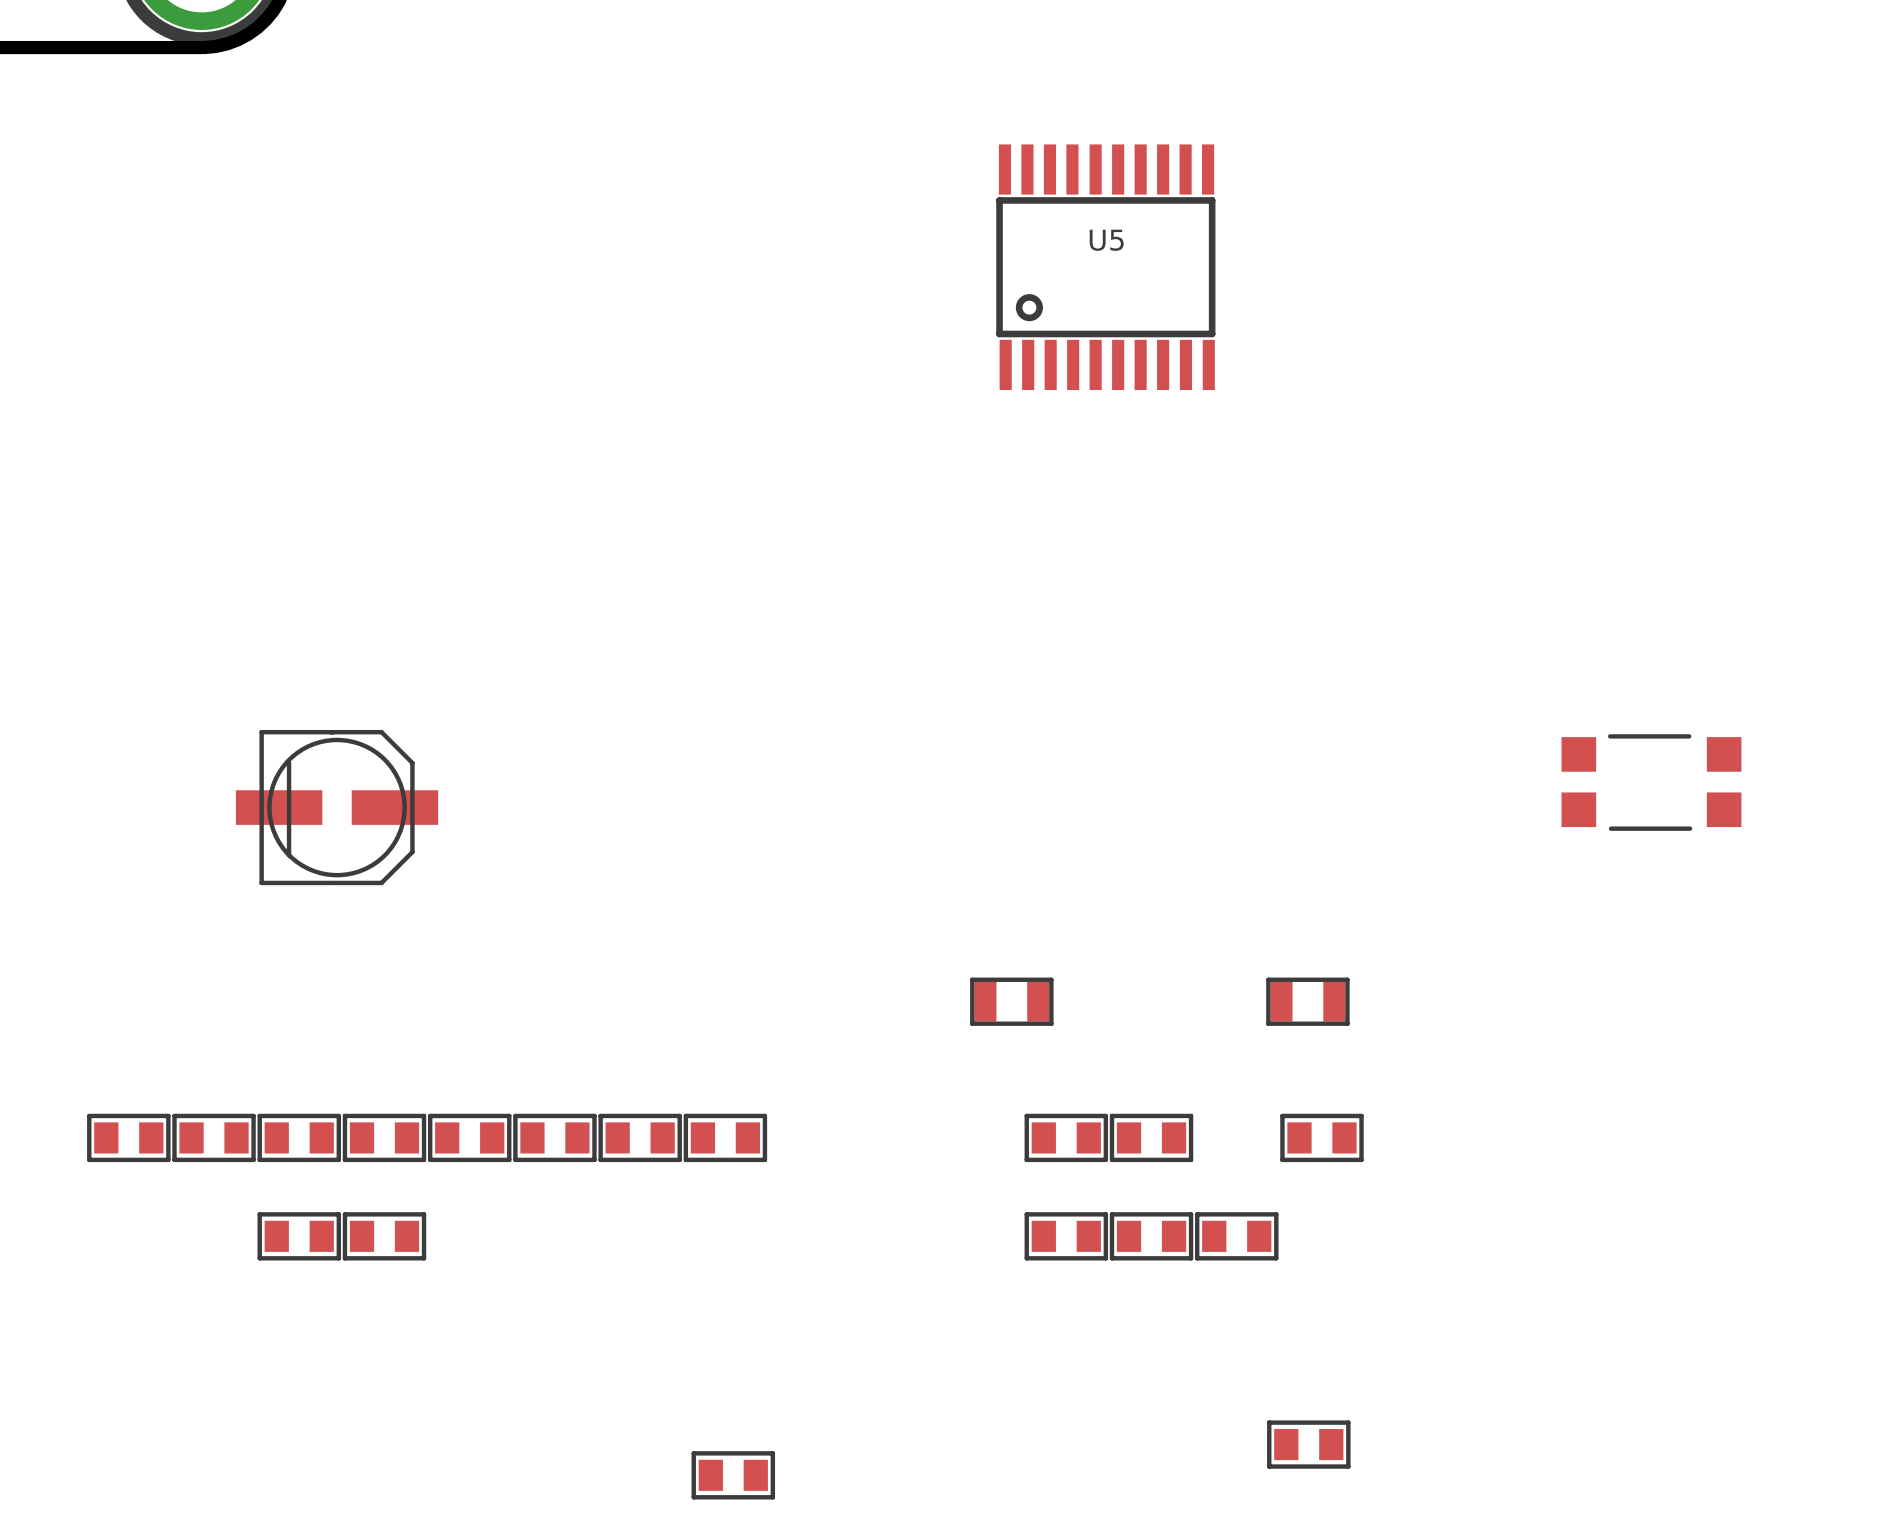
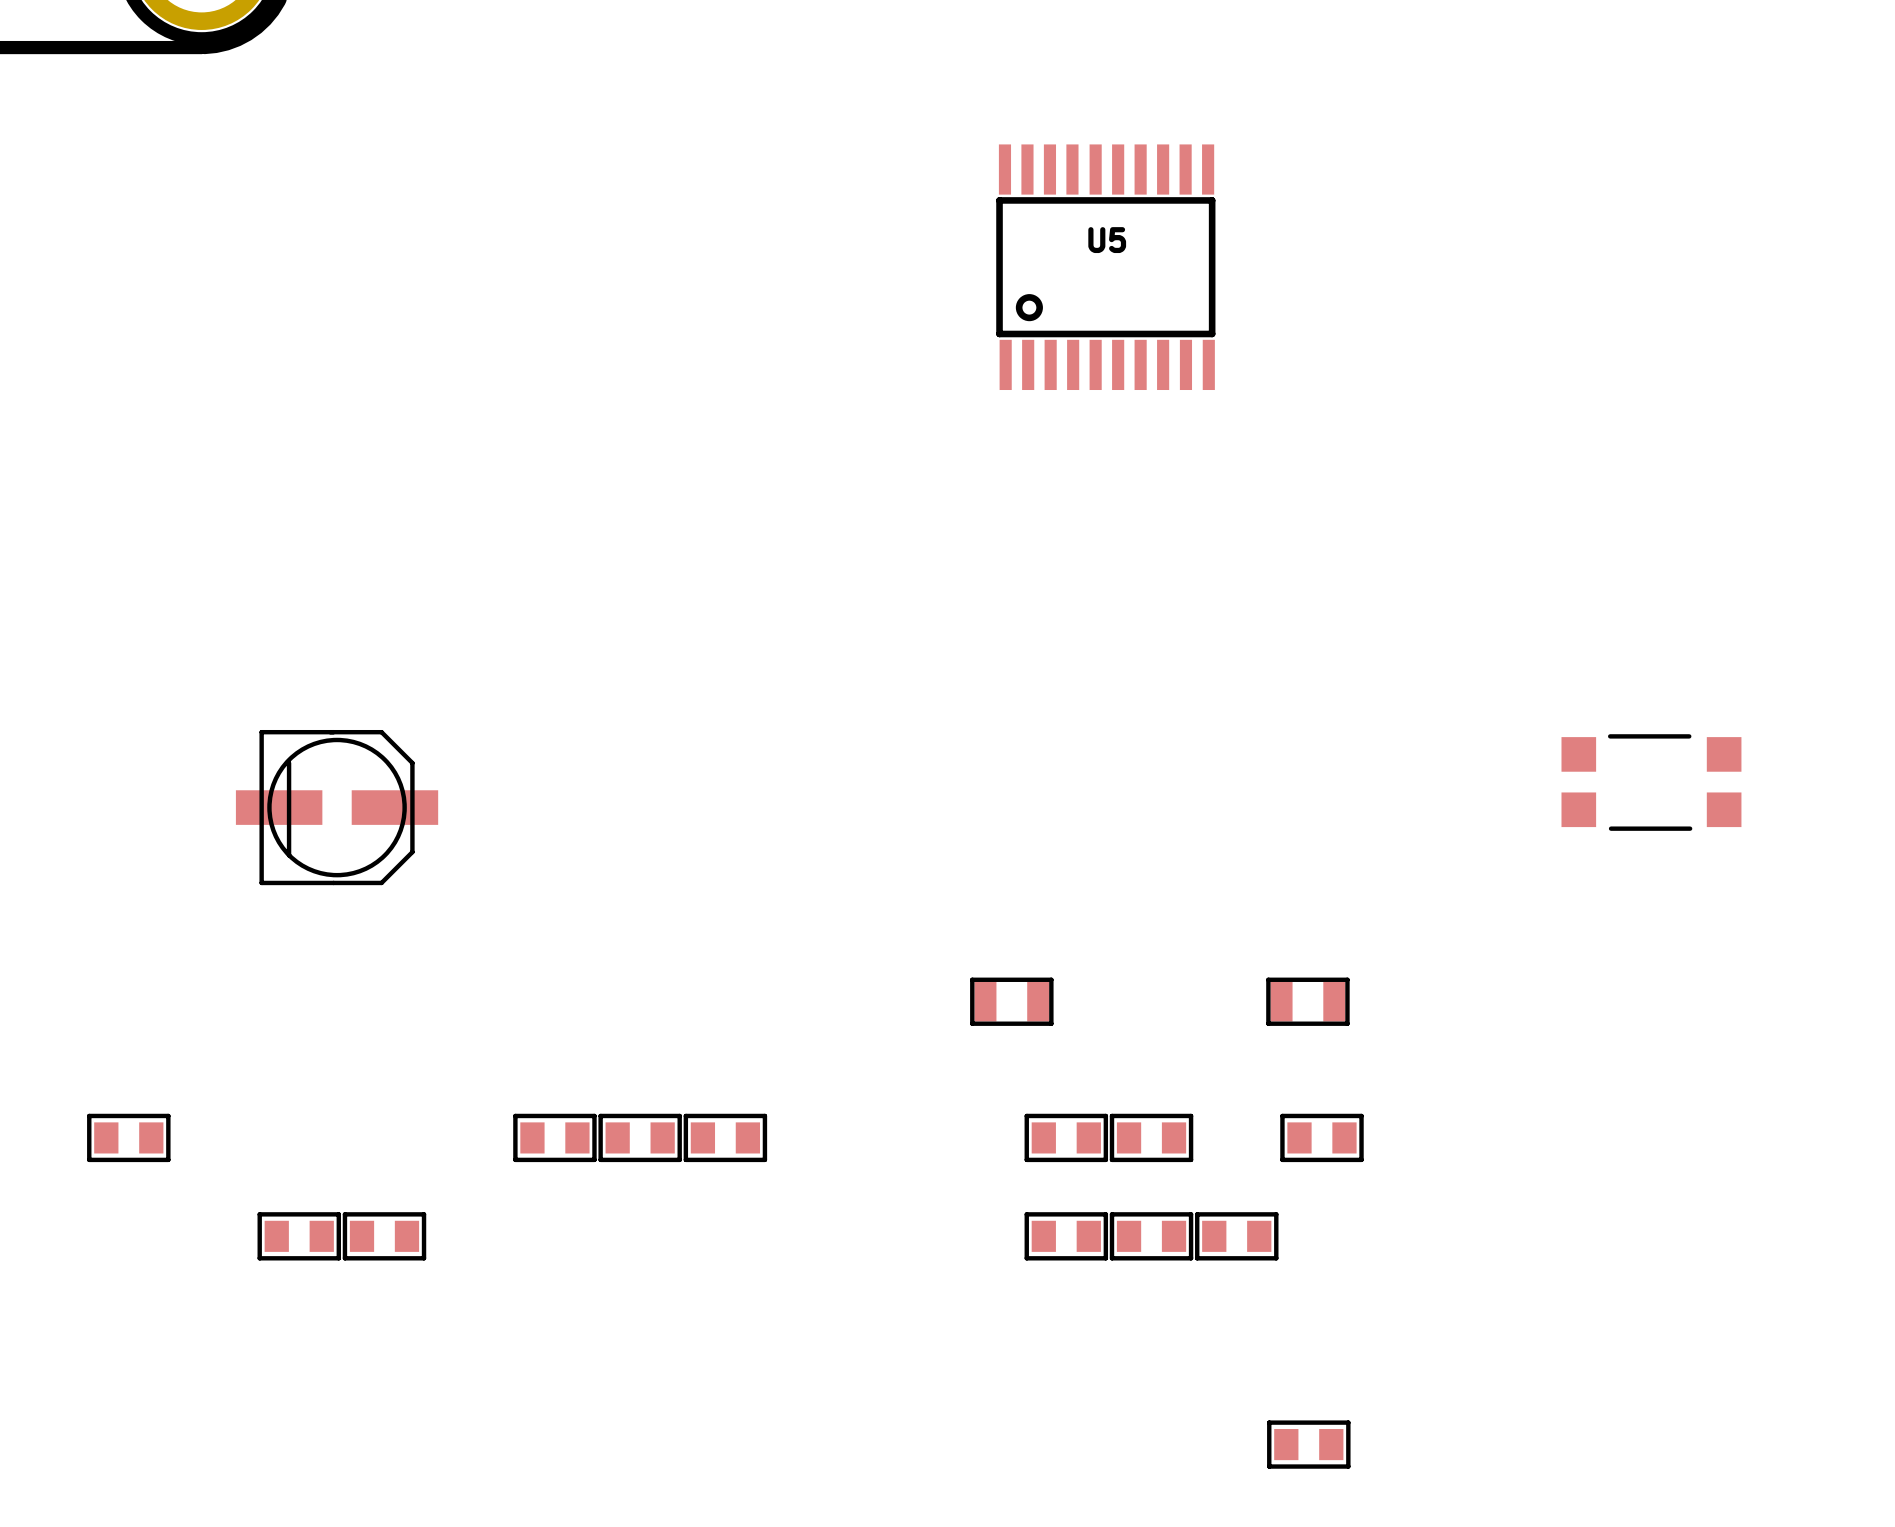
part: (214, 1137) -> none
part: (299, 1137) -> none
part: (384, 1137) -> none
part: (469, 1137) -> none
part: (733, 1475) -> none

